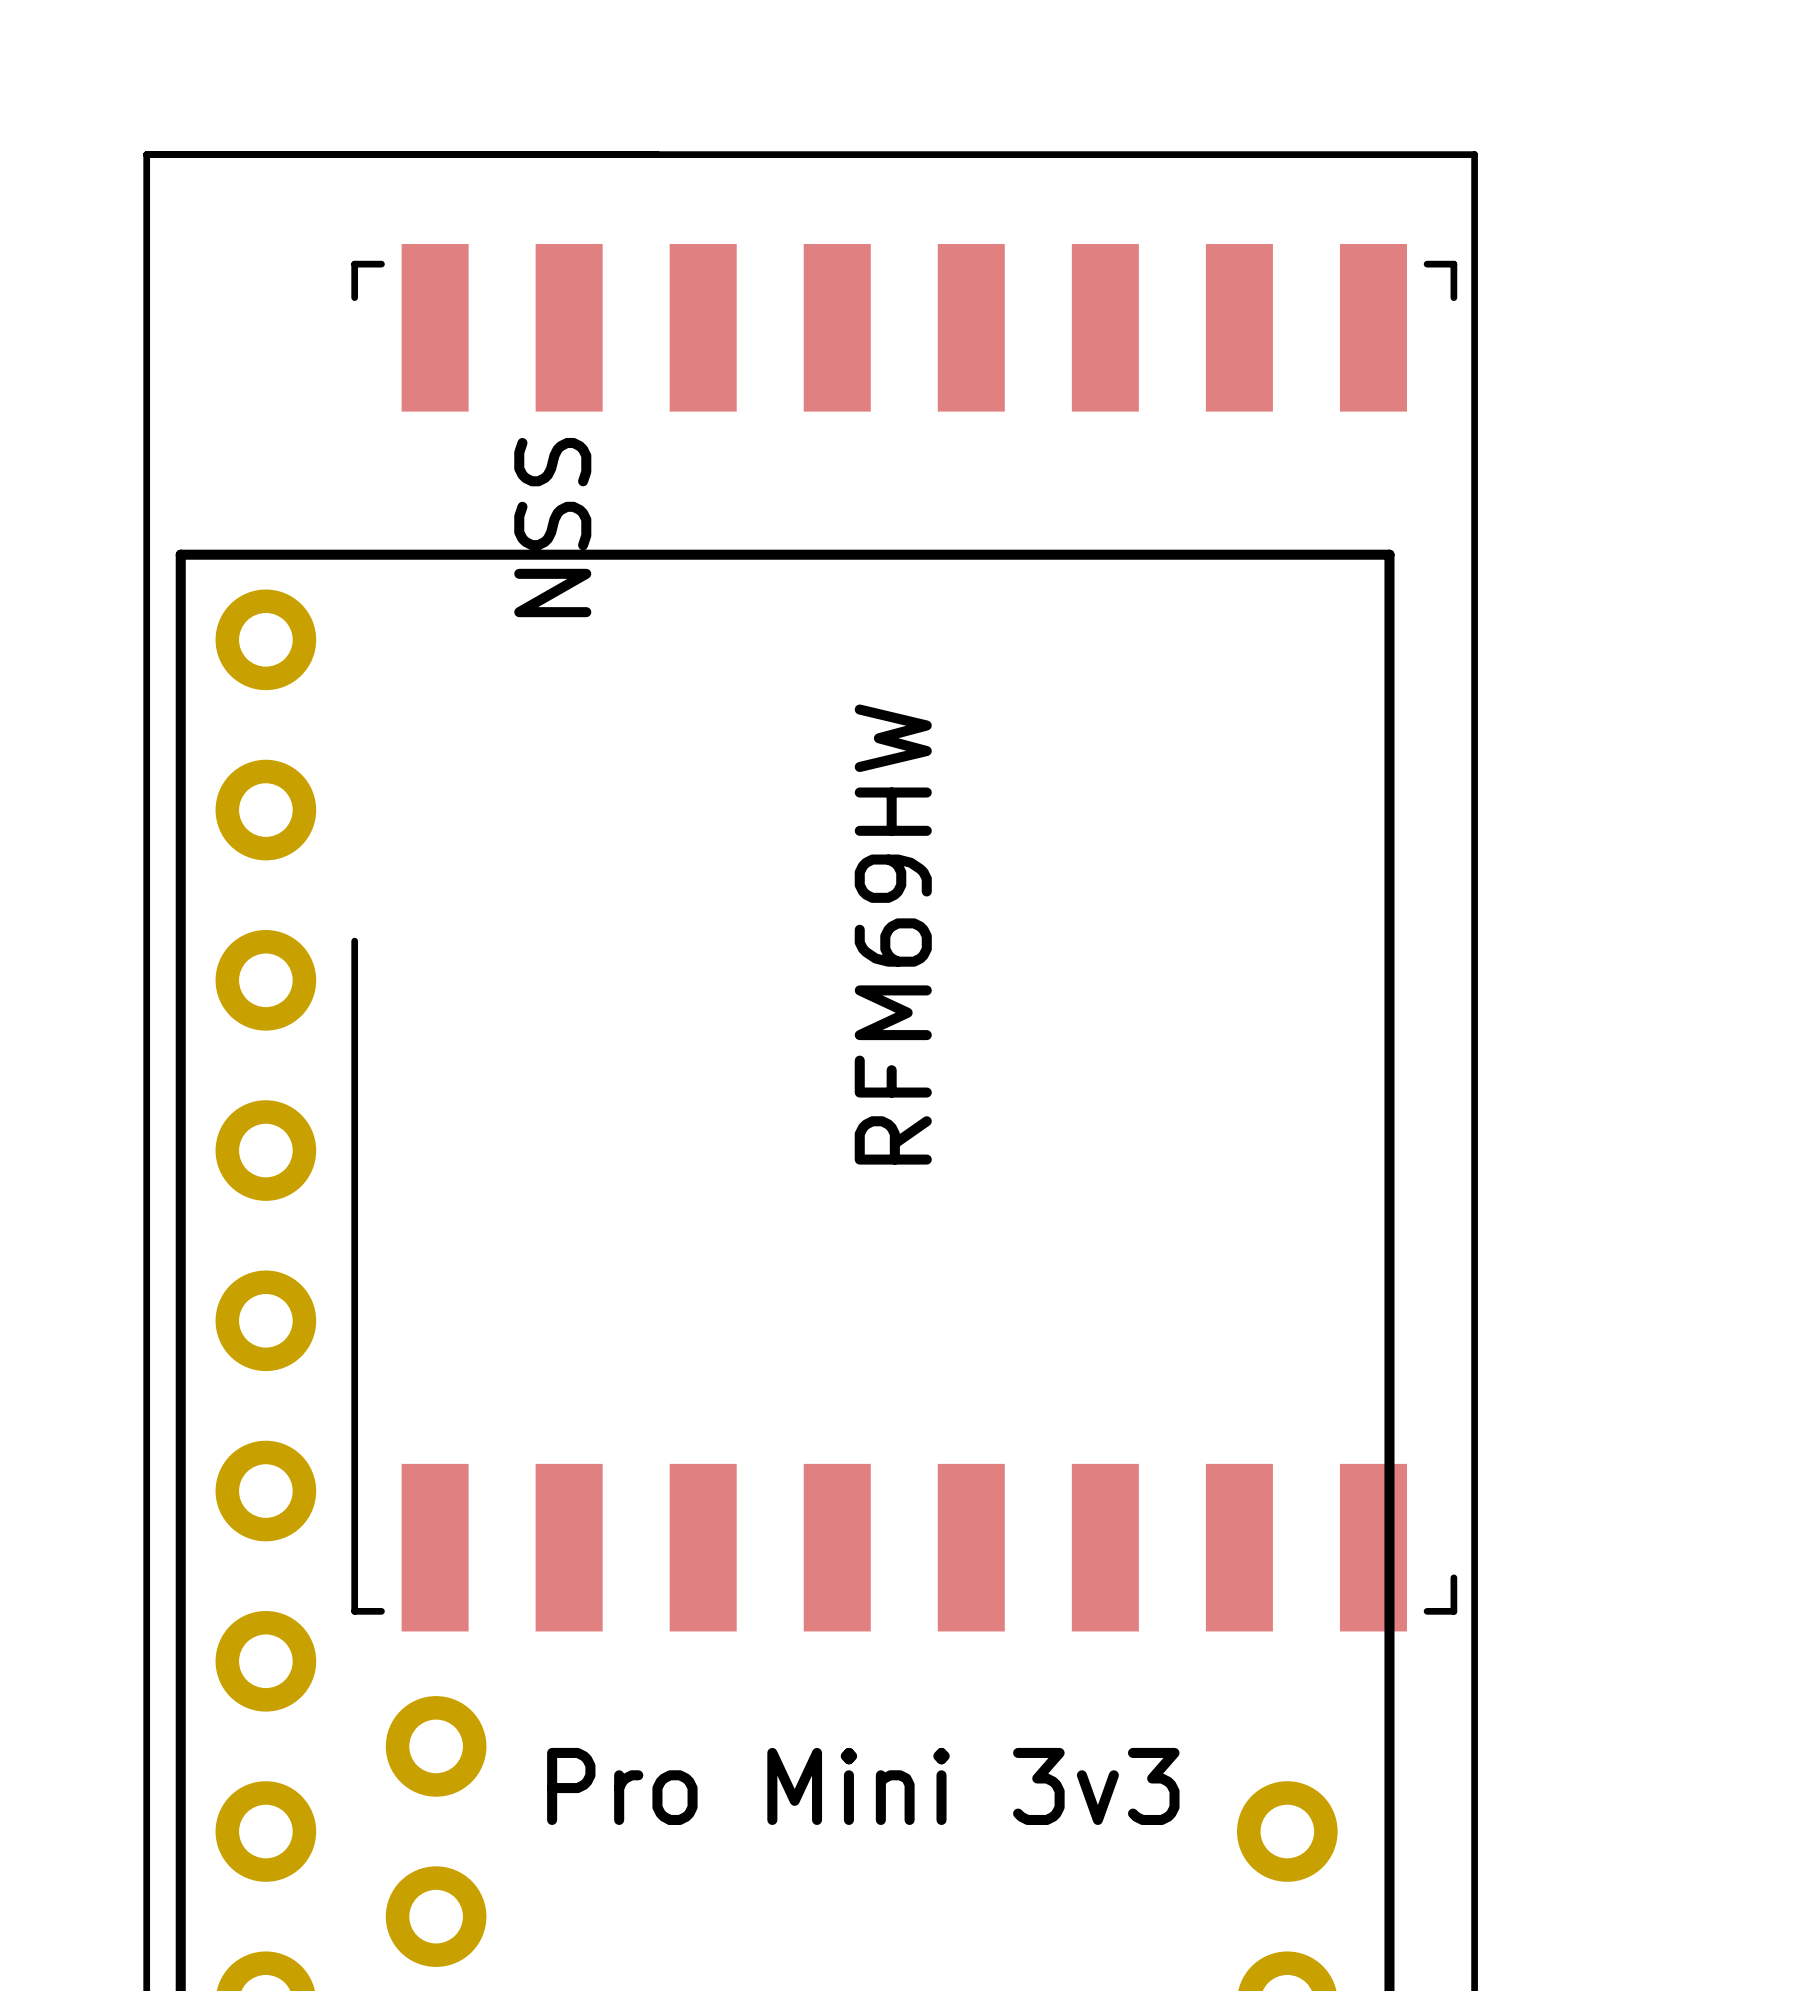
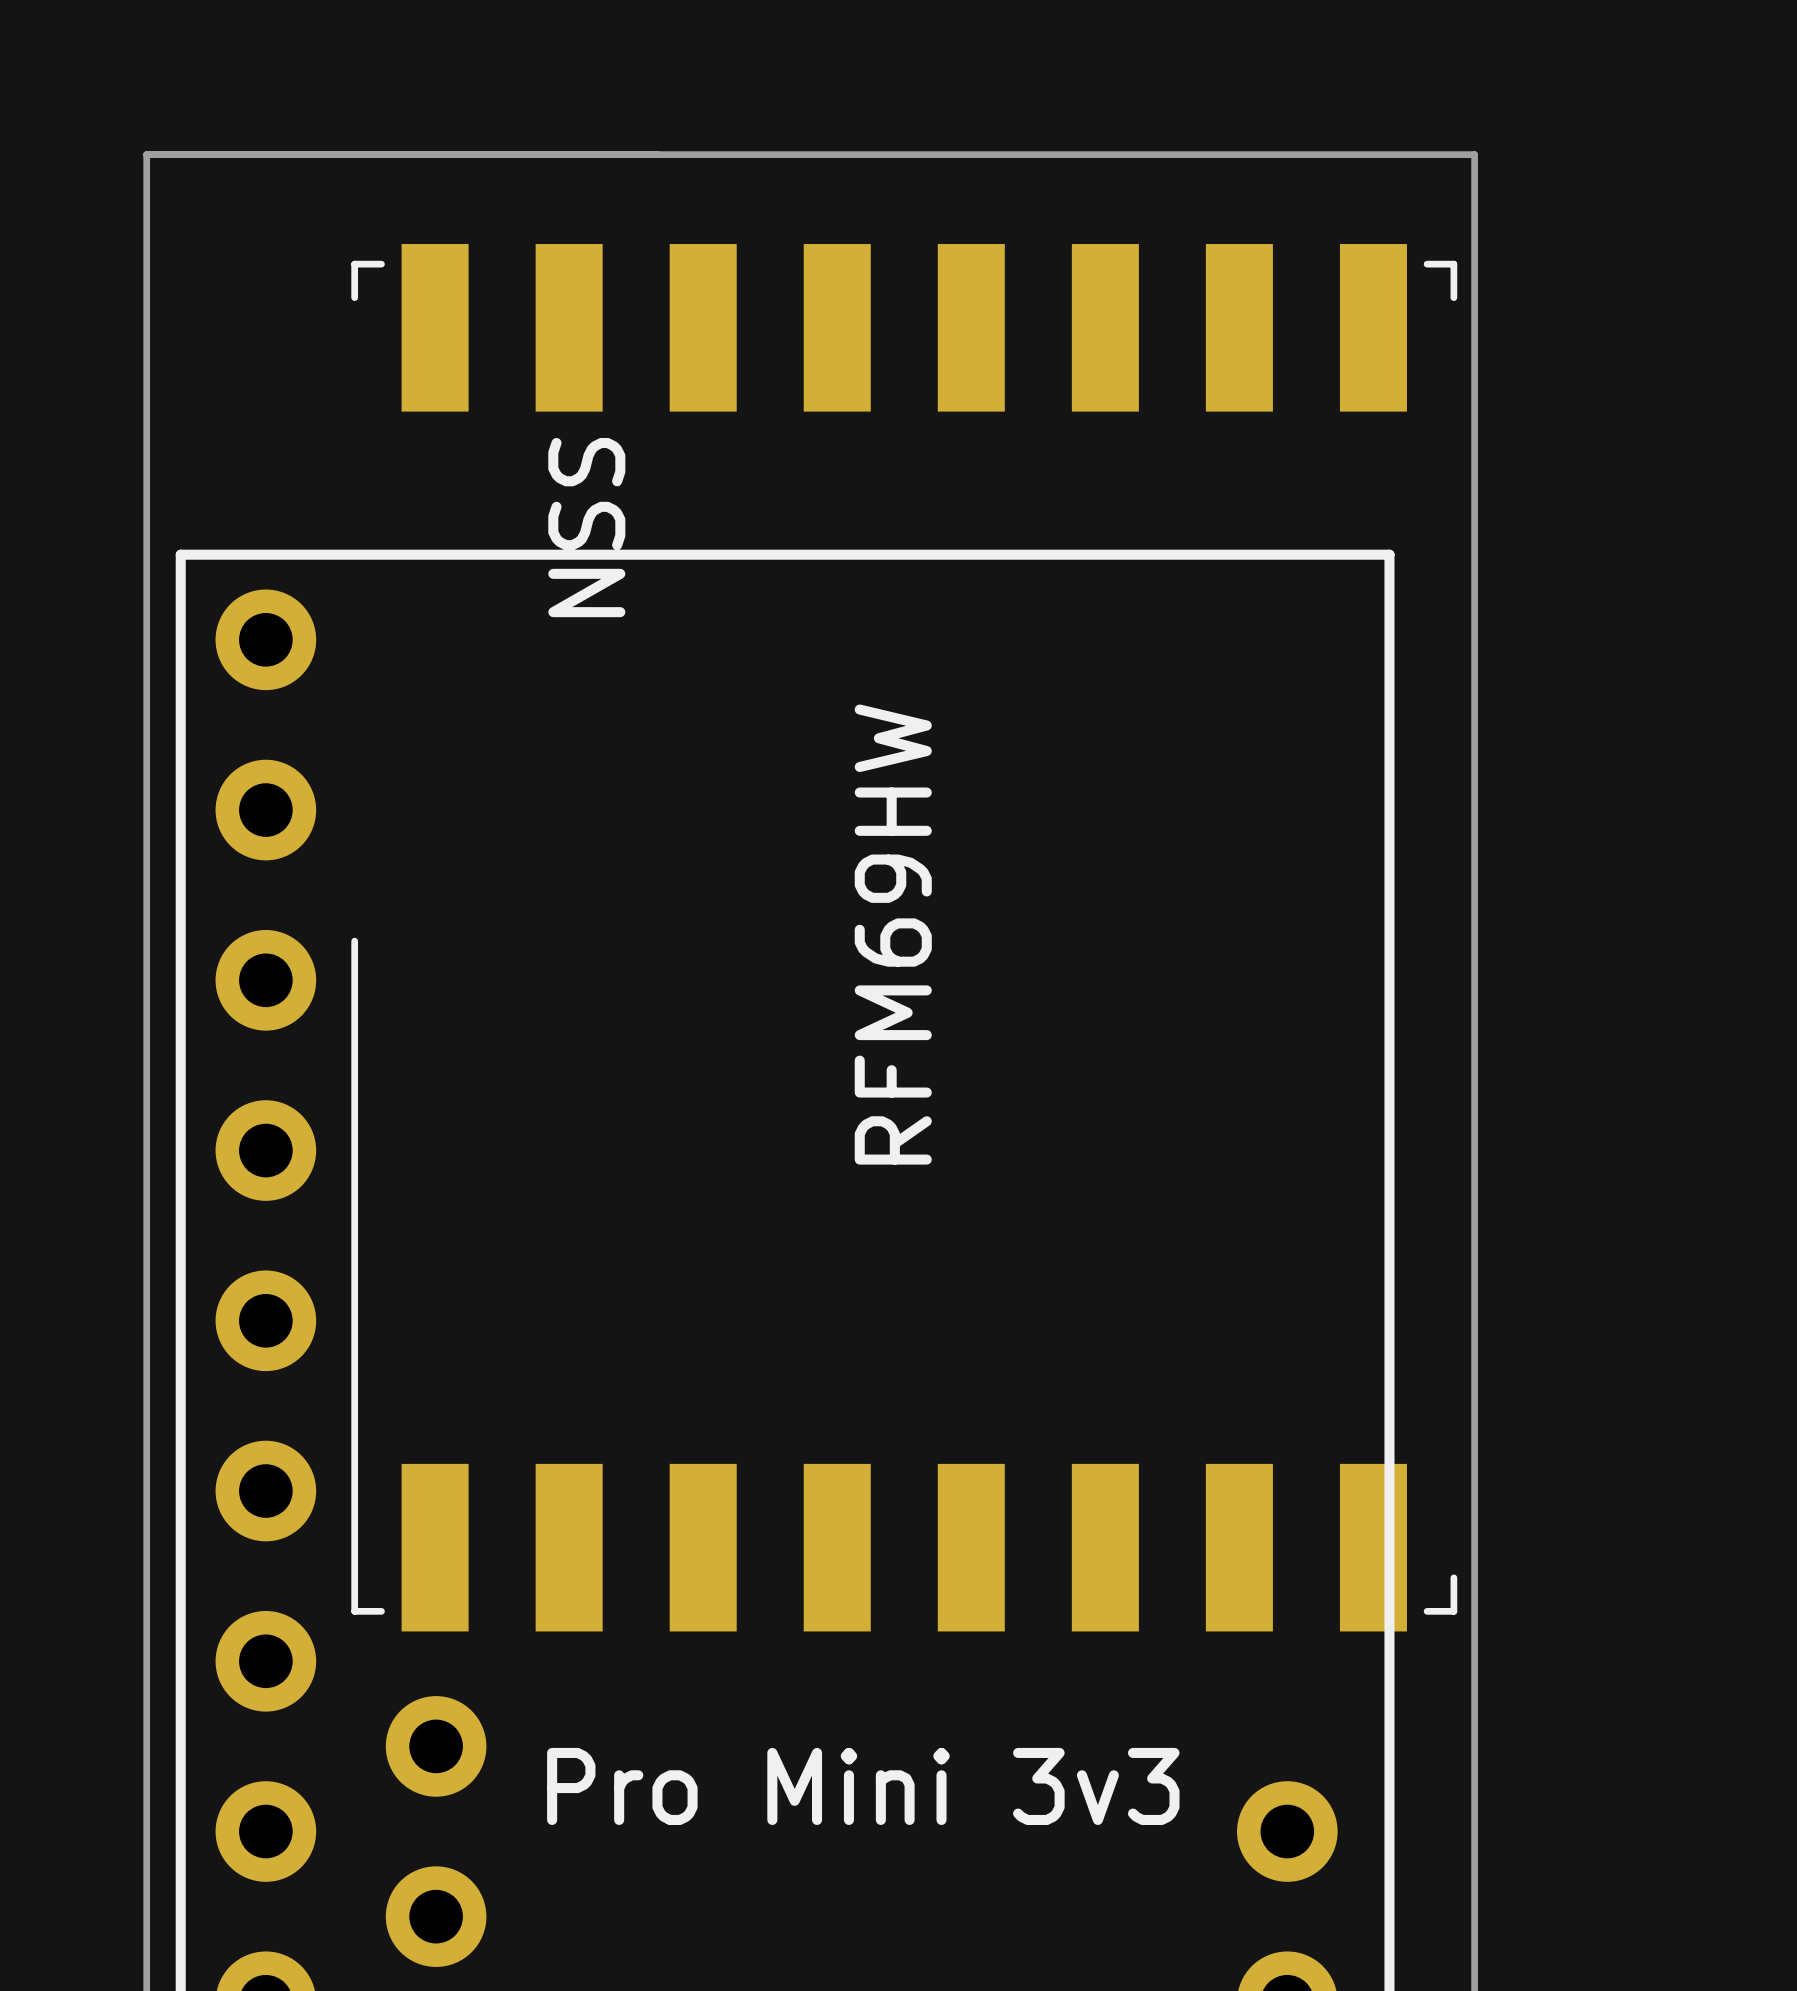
text position: NSS (552, 527) -> NSS (586, 527)

